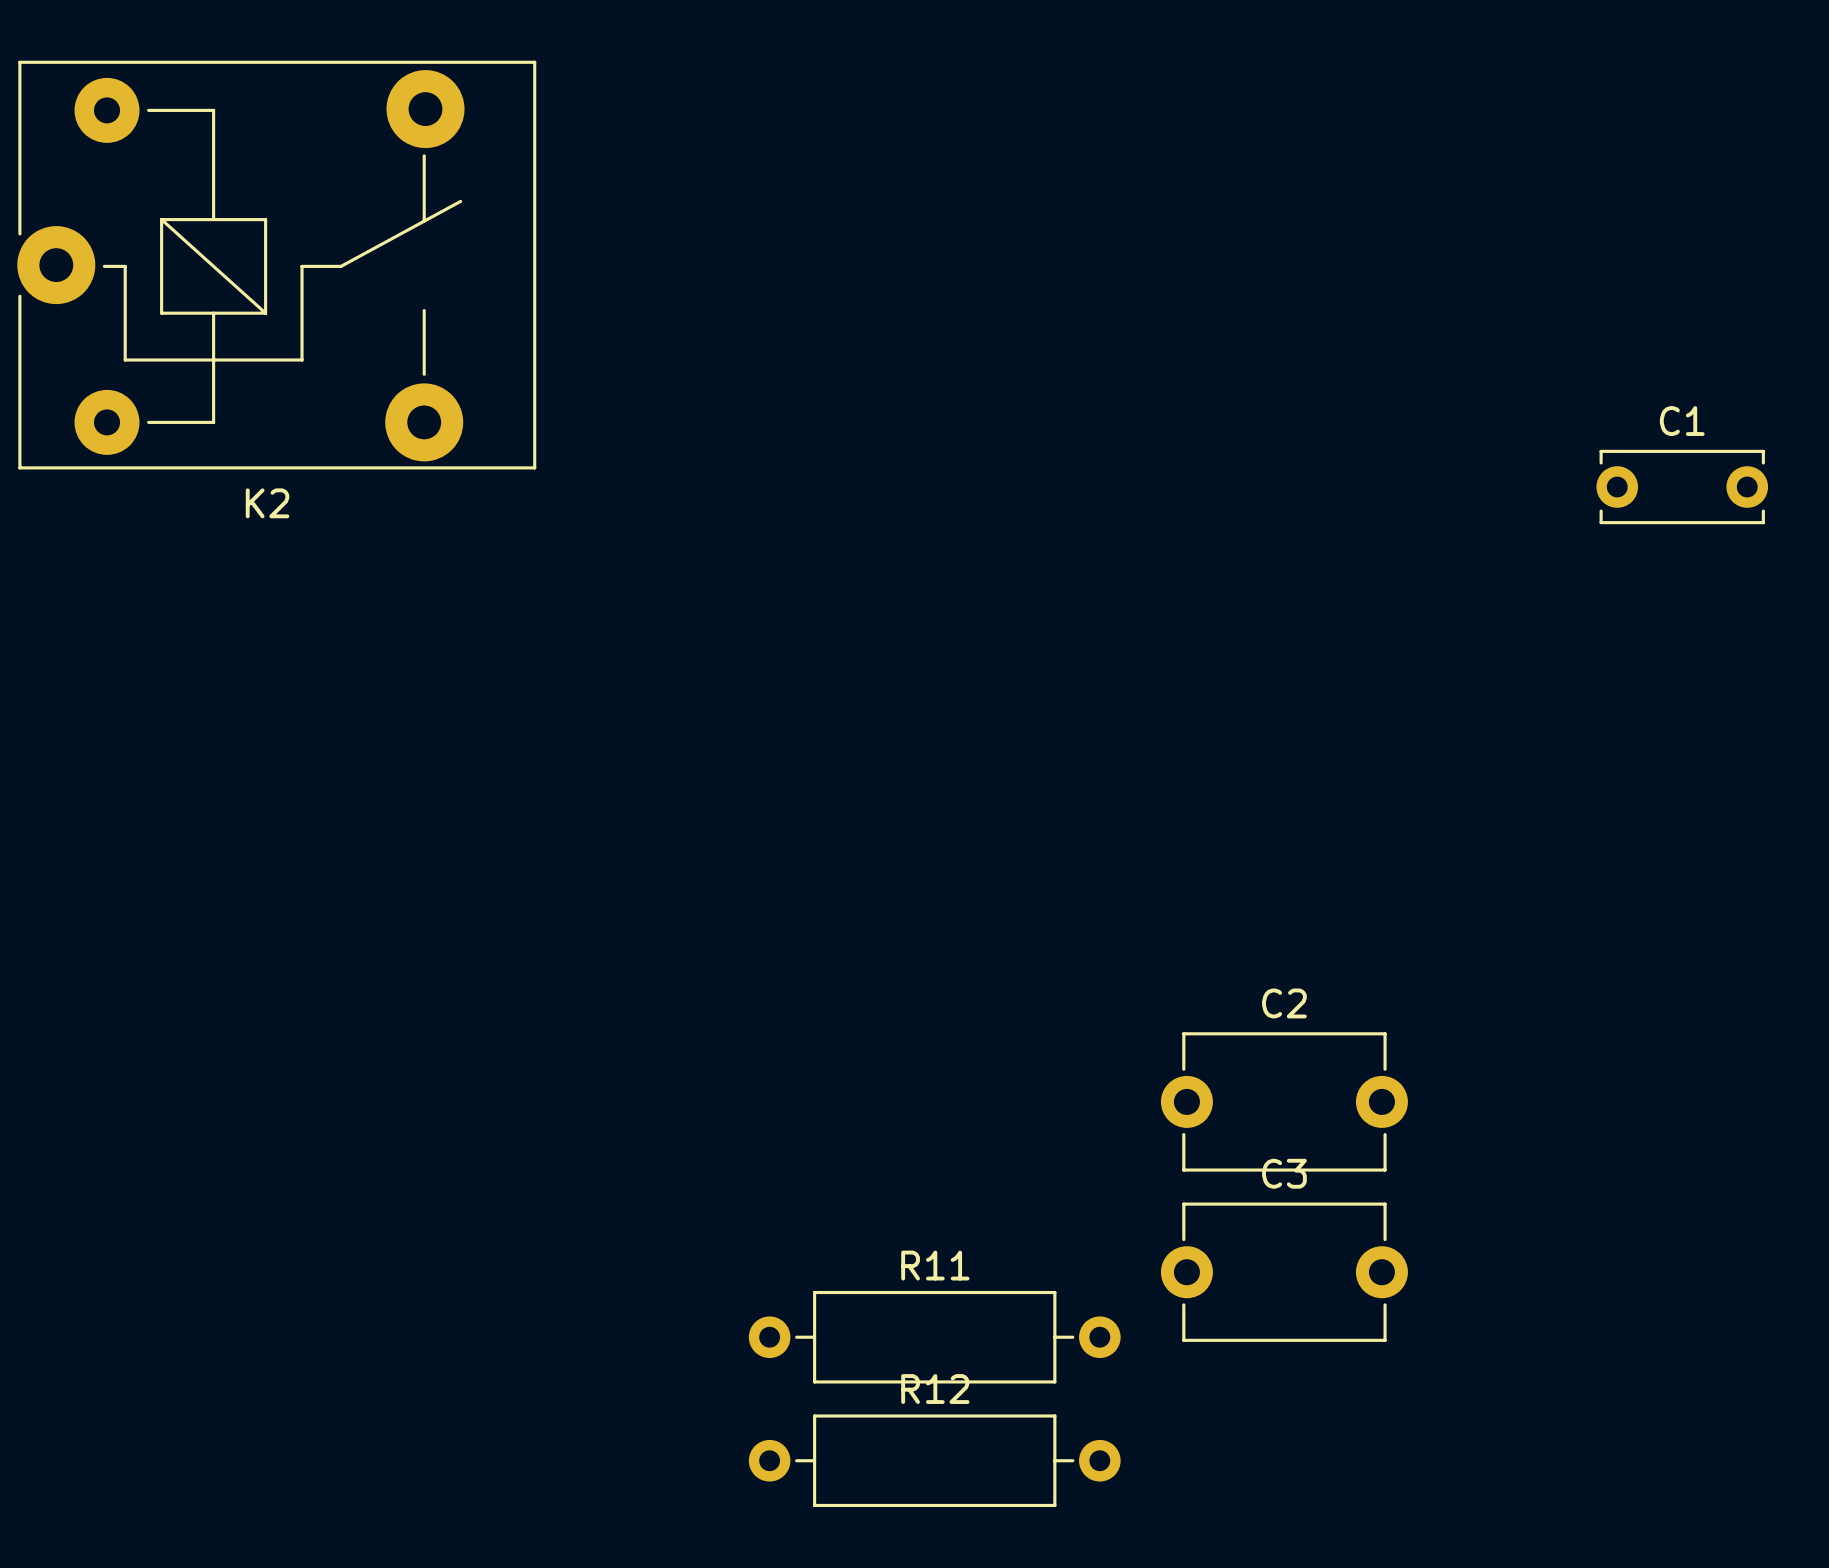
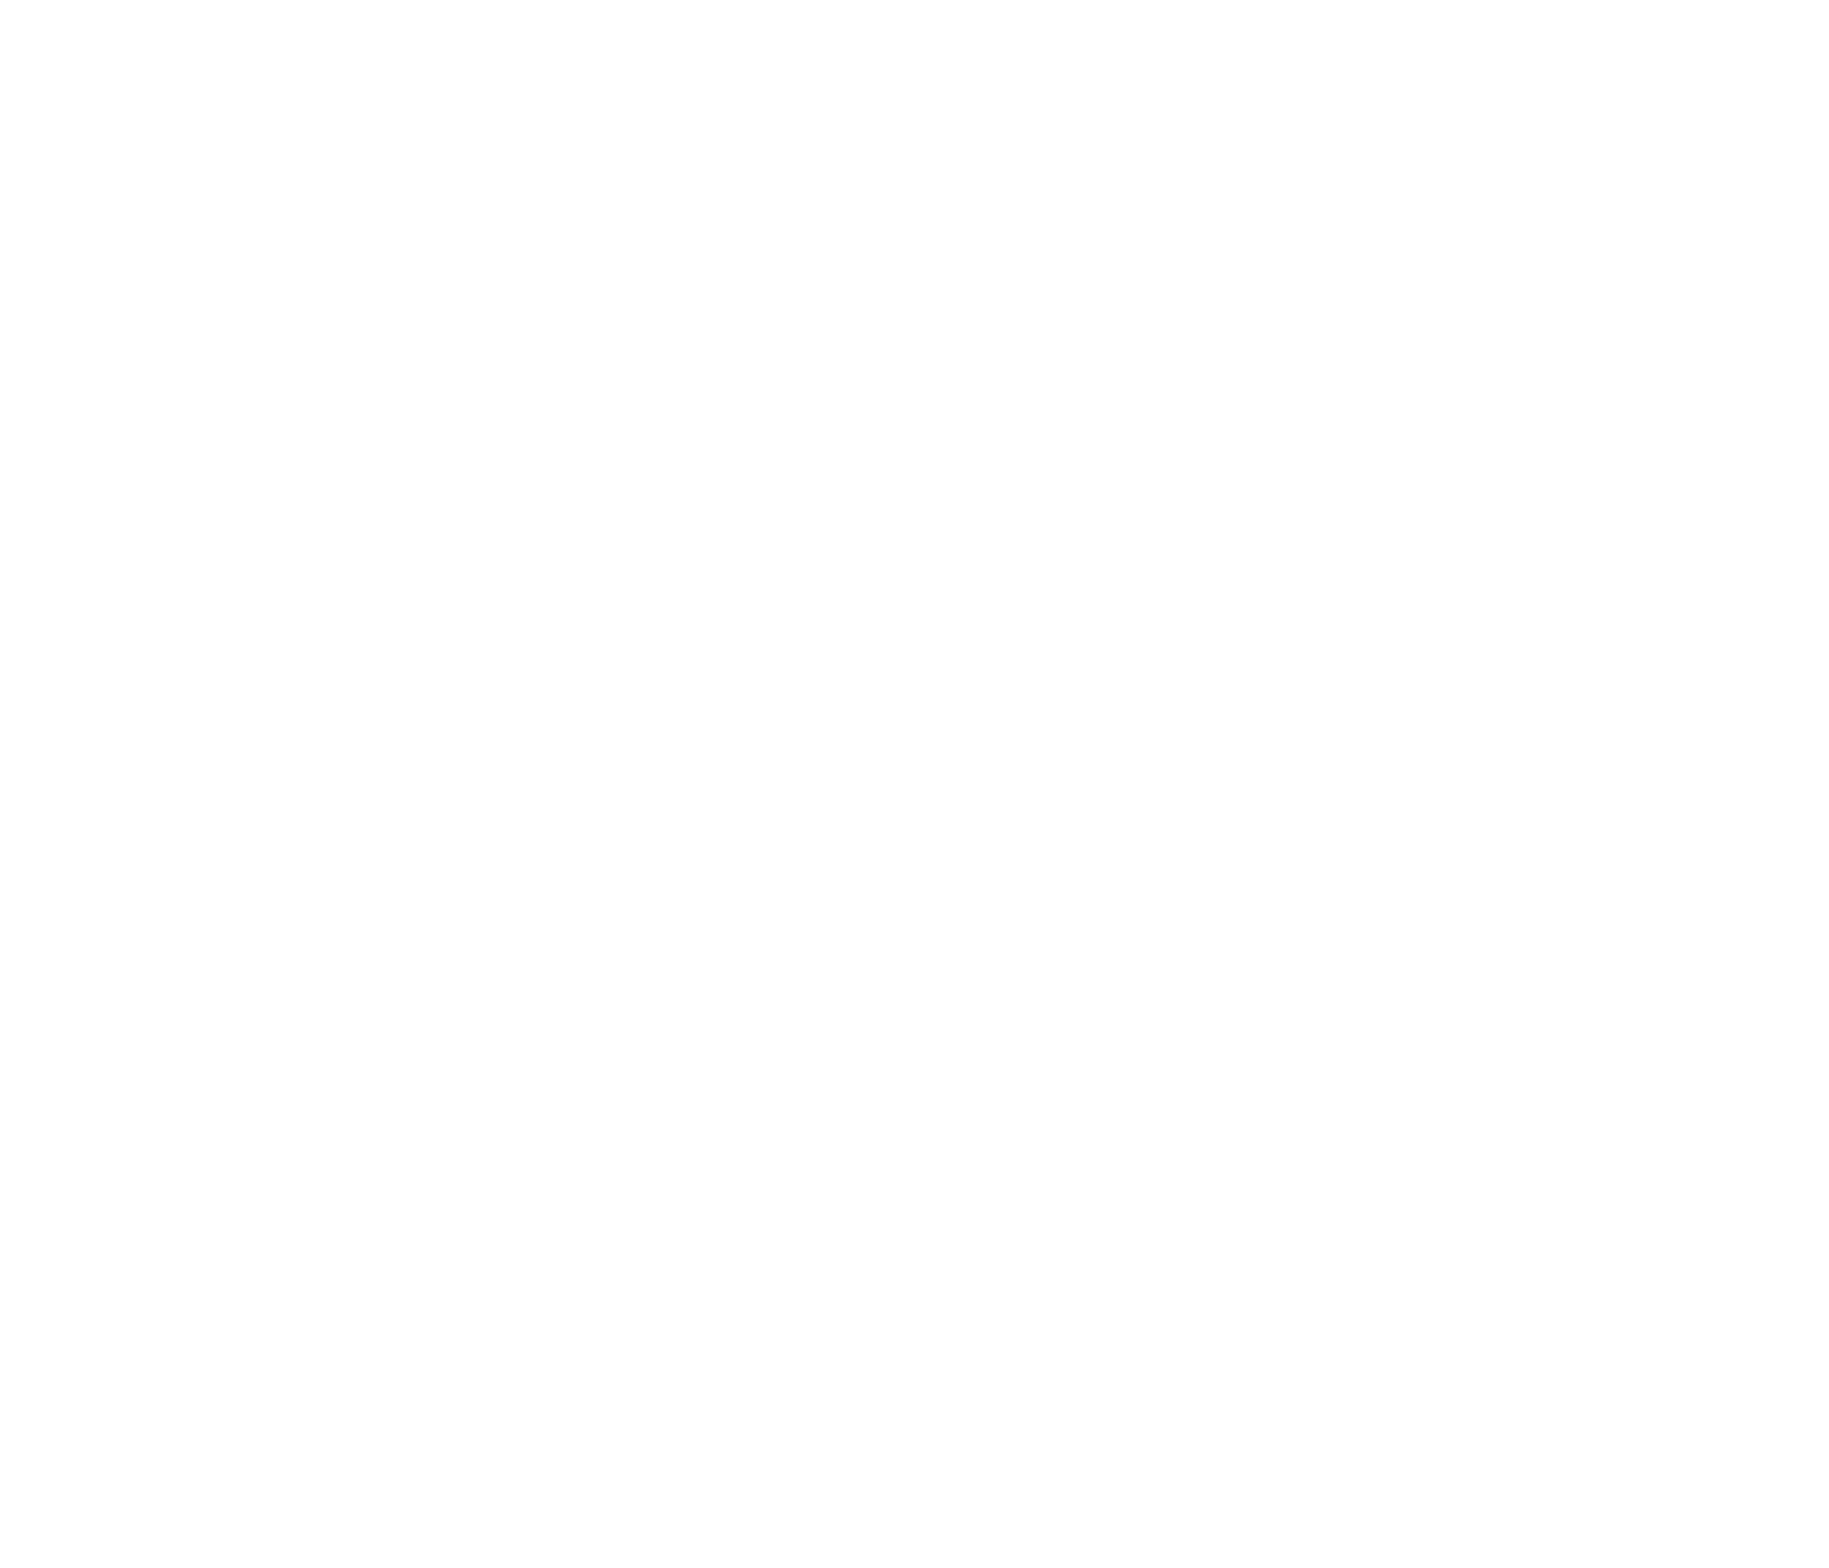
K2: (276, 265) -> none
C1: (1682, 487) -> none
C2: (1284, 1101) -> none
C3: (1284, 1272) -> none
R11: (934, 1337) -> none
R12: (934, 1460) -> none

